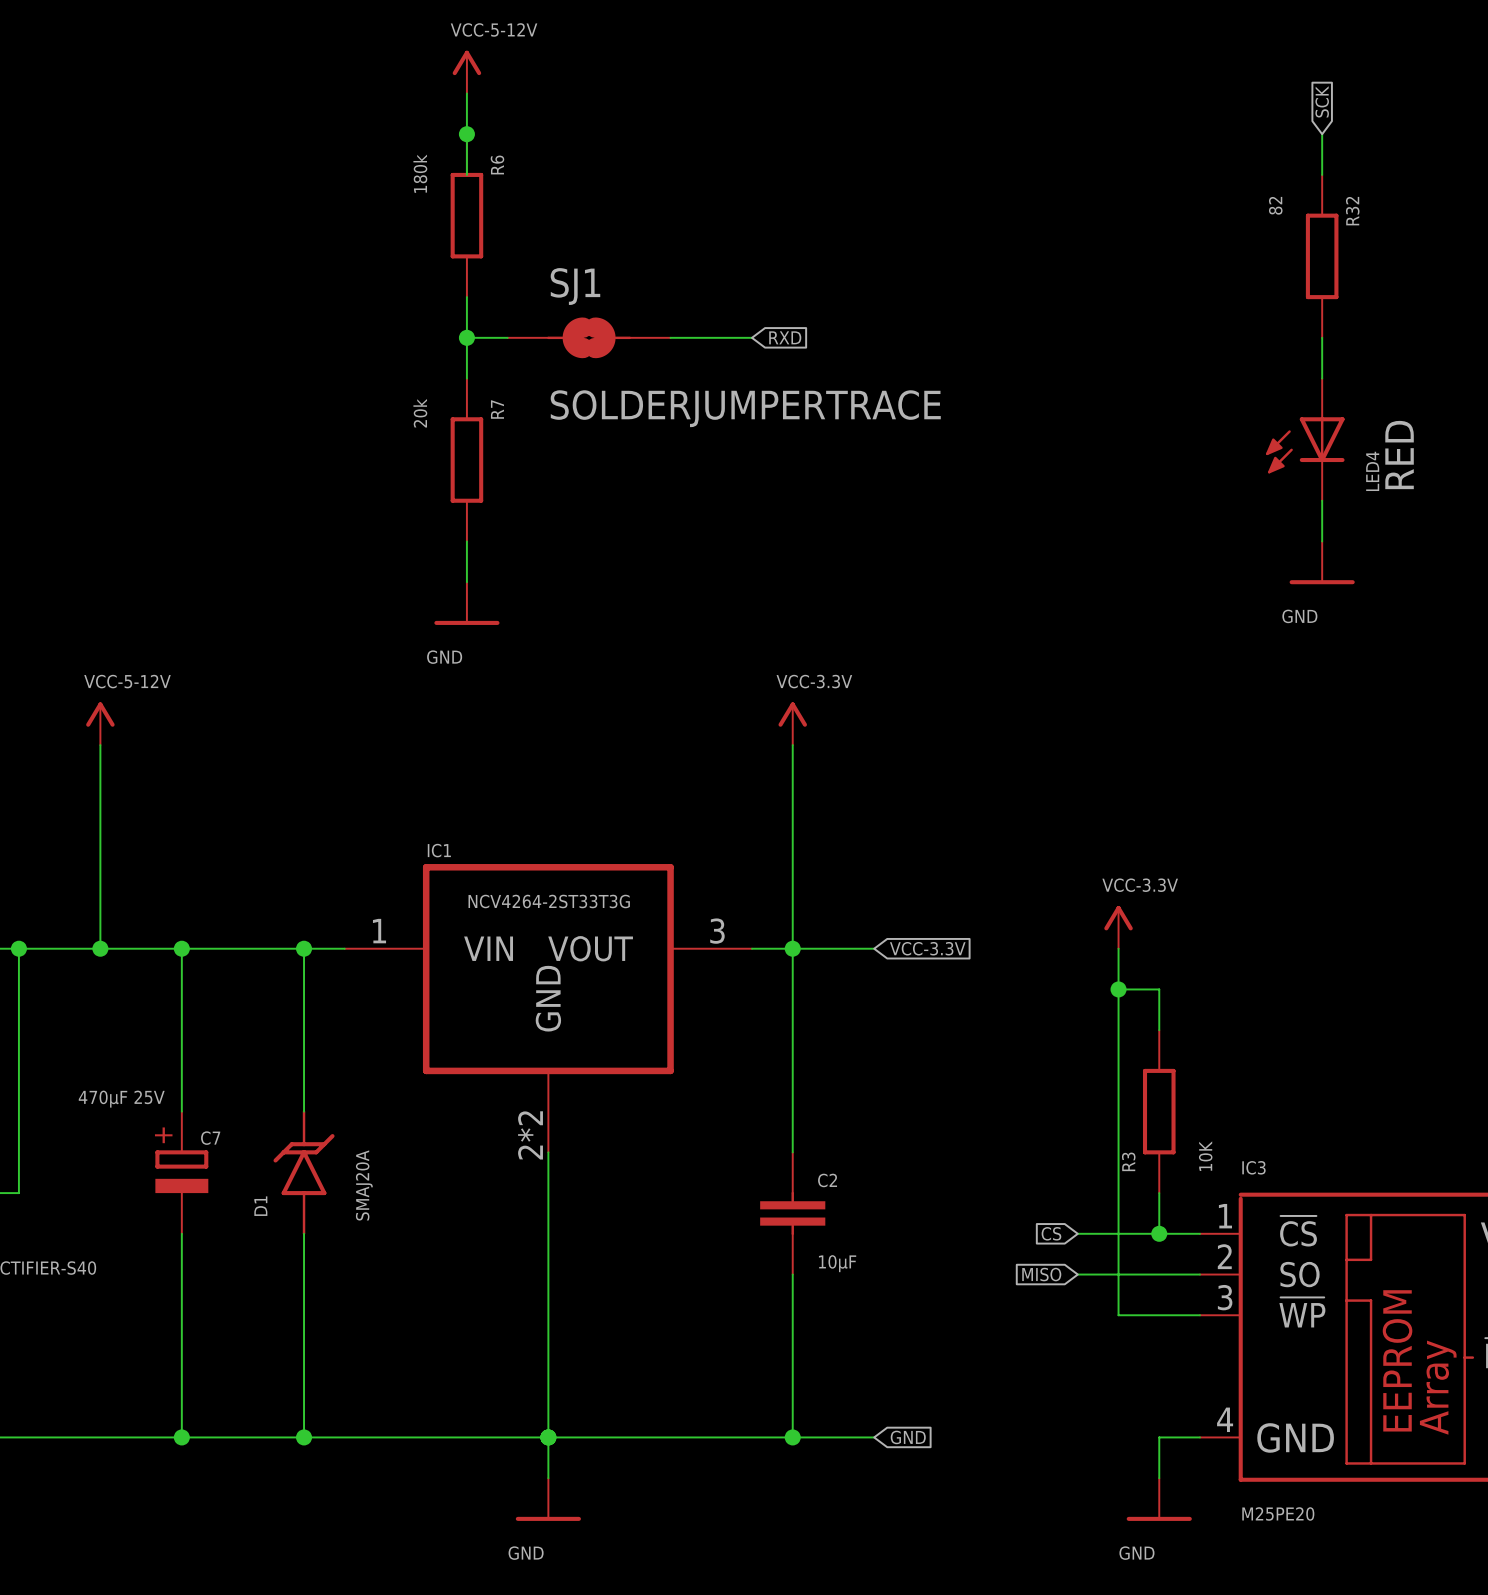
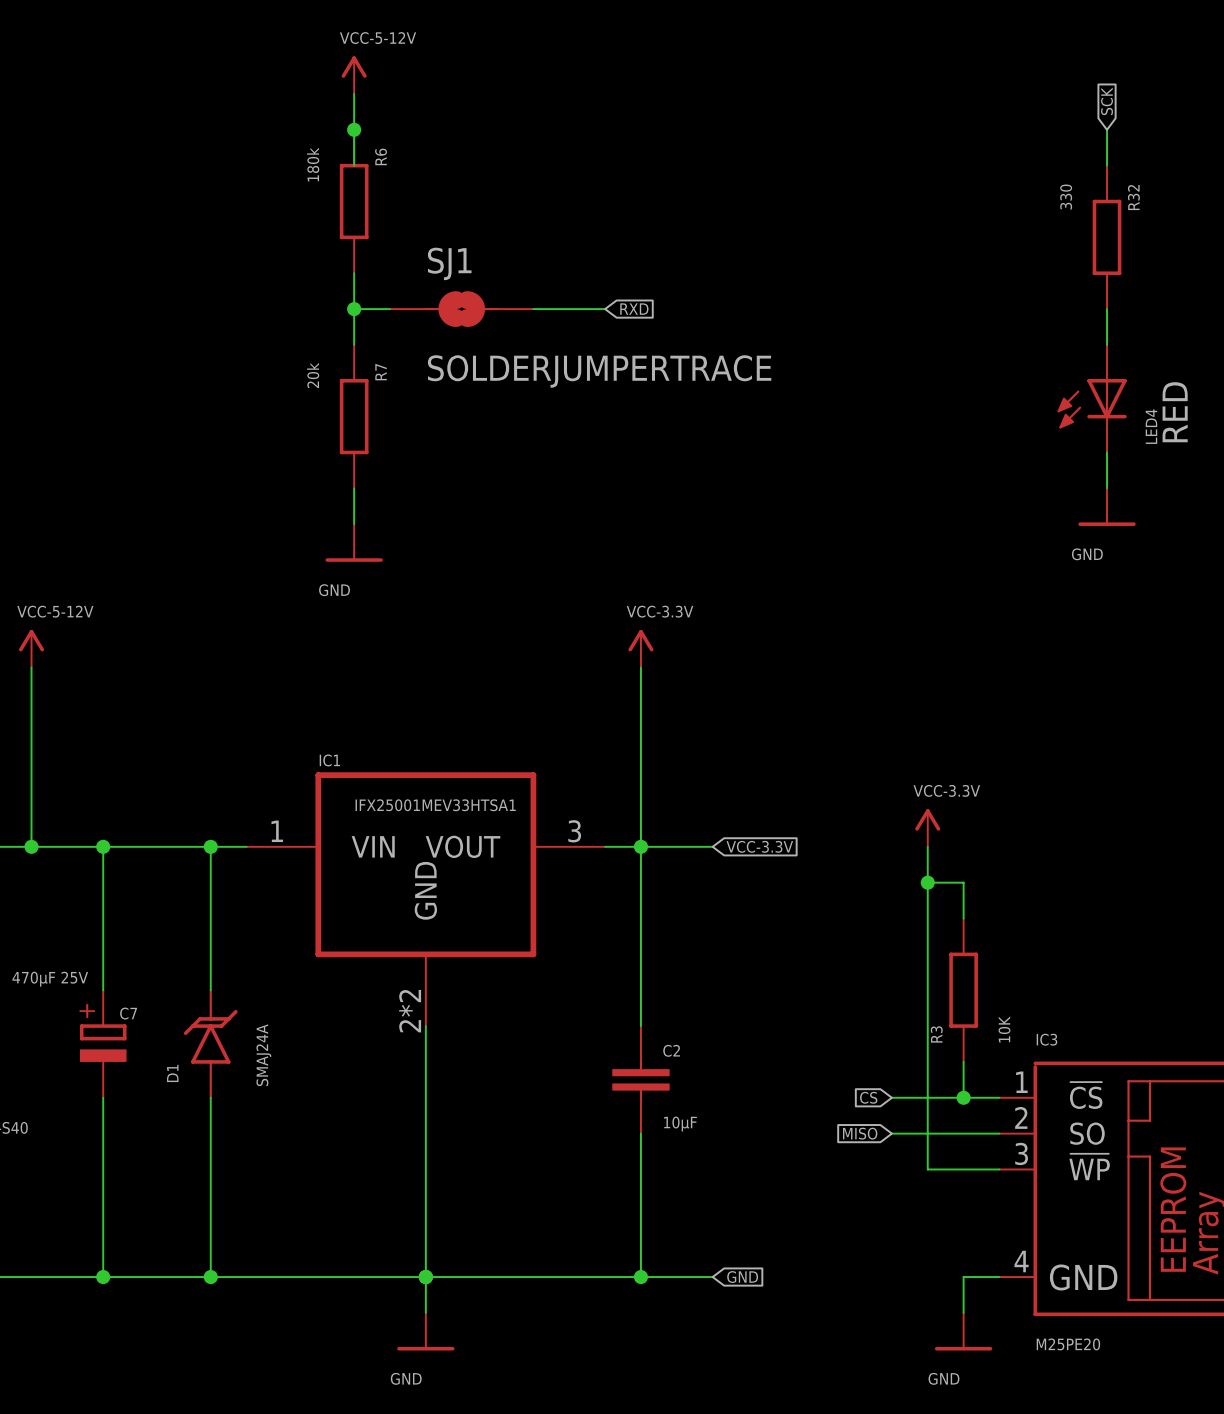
R32 value: 82 (1275, 205) -> 330 (1066, 197)
IC1 value: NCV4264-2ST33T3G (549, 901) -> IFX25001MEV33HTSA1 (435, 805)
D1 value: SMAJ20A (364, 1185) -> SMAJ24A (263, 1055)

